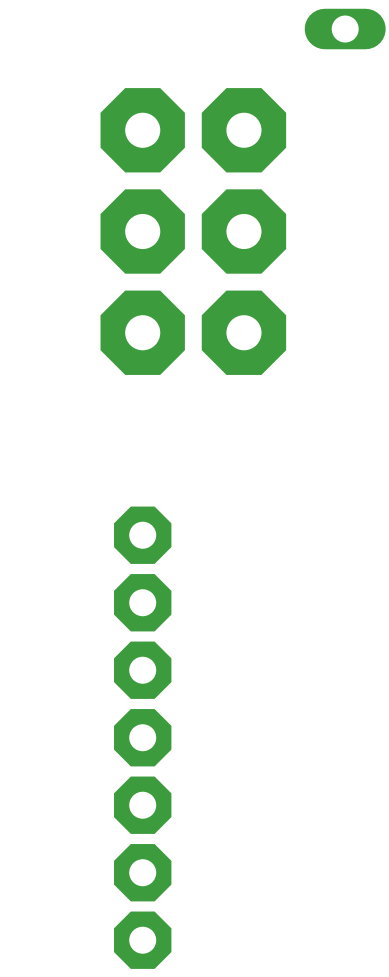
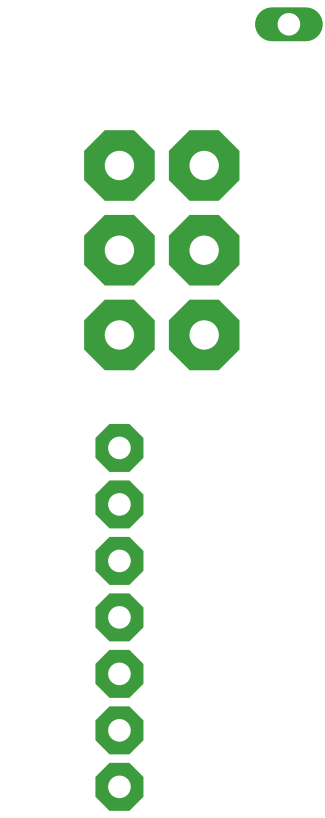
part: (142, 130) -> none
part: (243, 130) -> none
part: none -> (119, 165)
part: none -> (204, 165)
part: (142, 231) -> none
part: (243, 231) -> none
part: none -> (119, 250)
part: none -> (204, 250)
part: (142, 332) -> none
part: (243, 332) -> none
part: none -> (119, 334)
part: none -> (204, 334)

